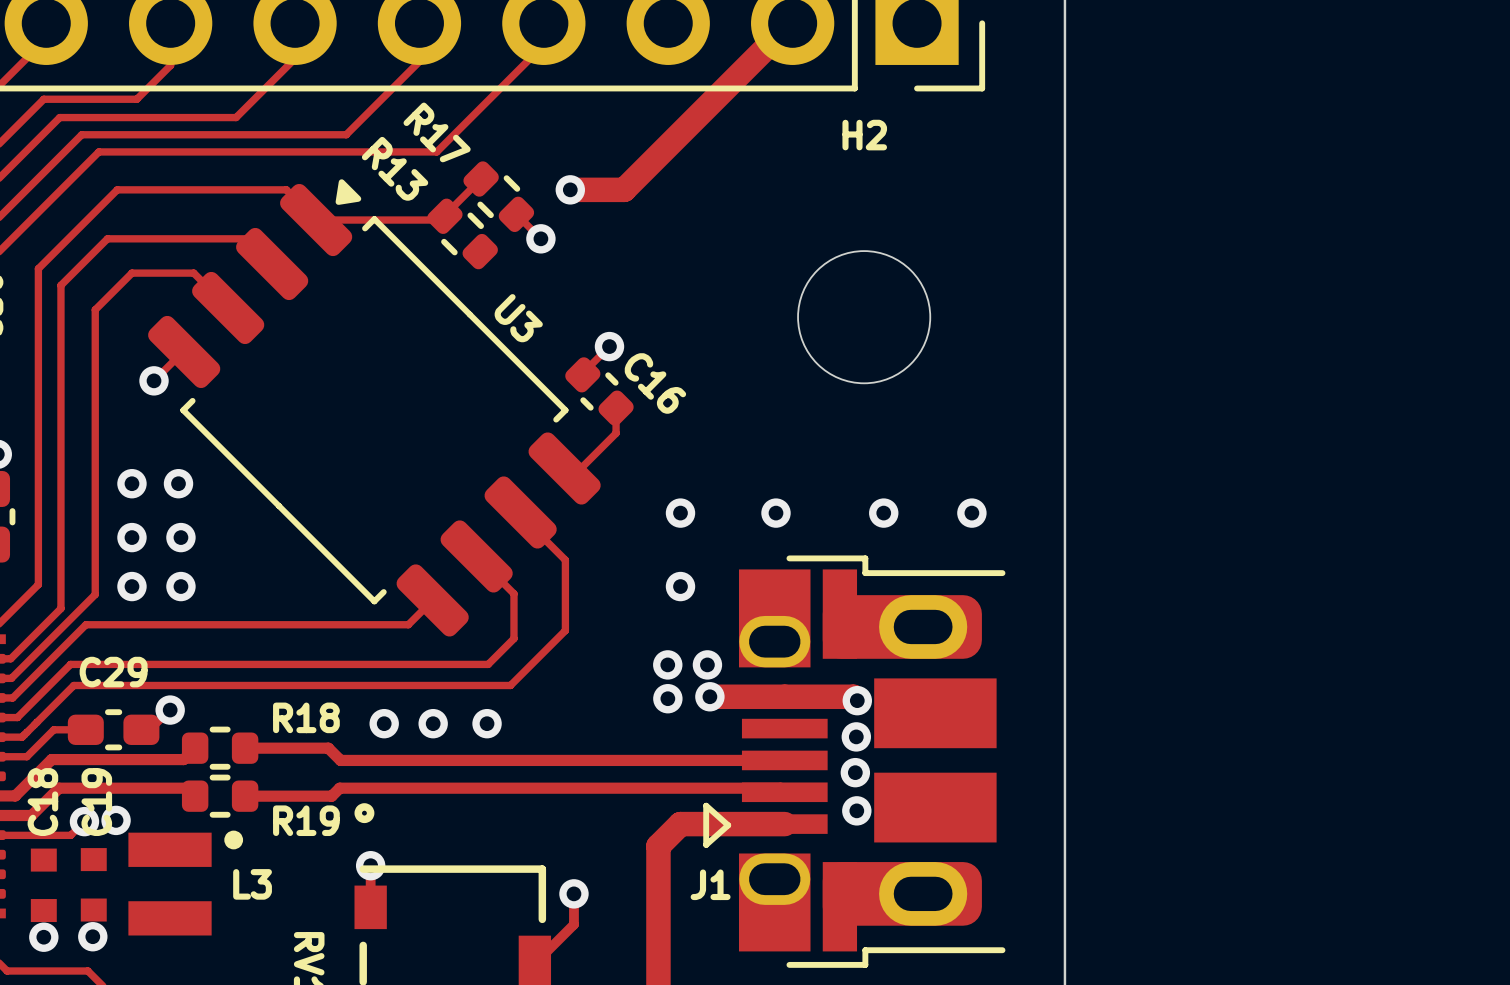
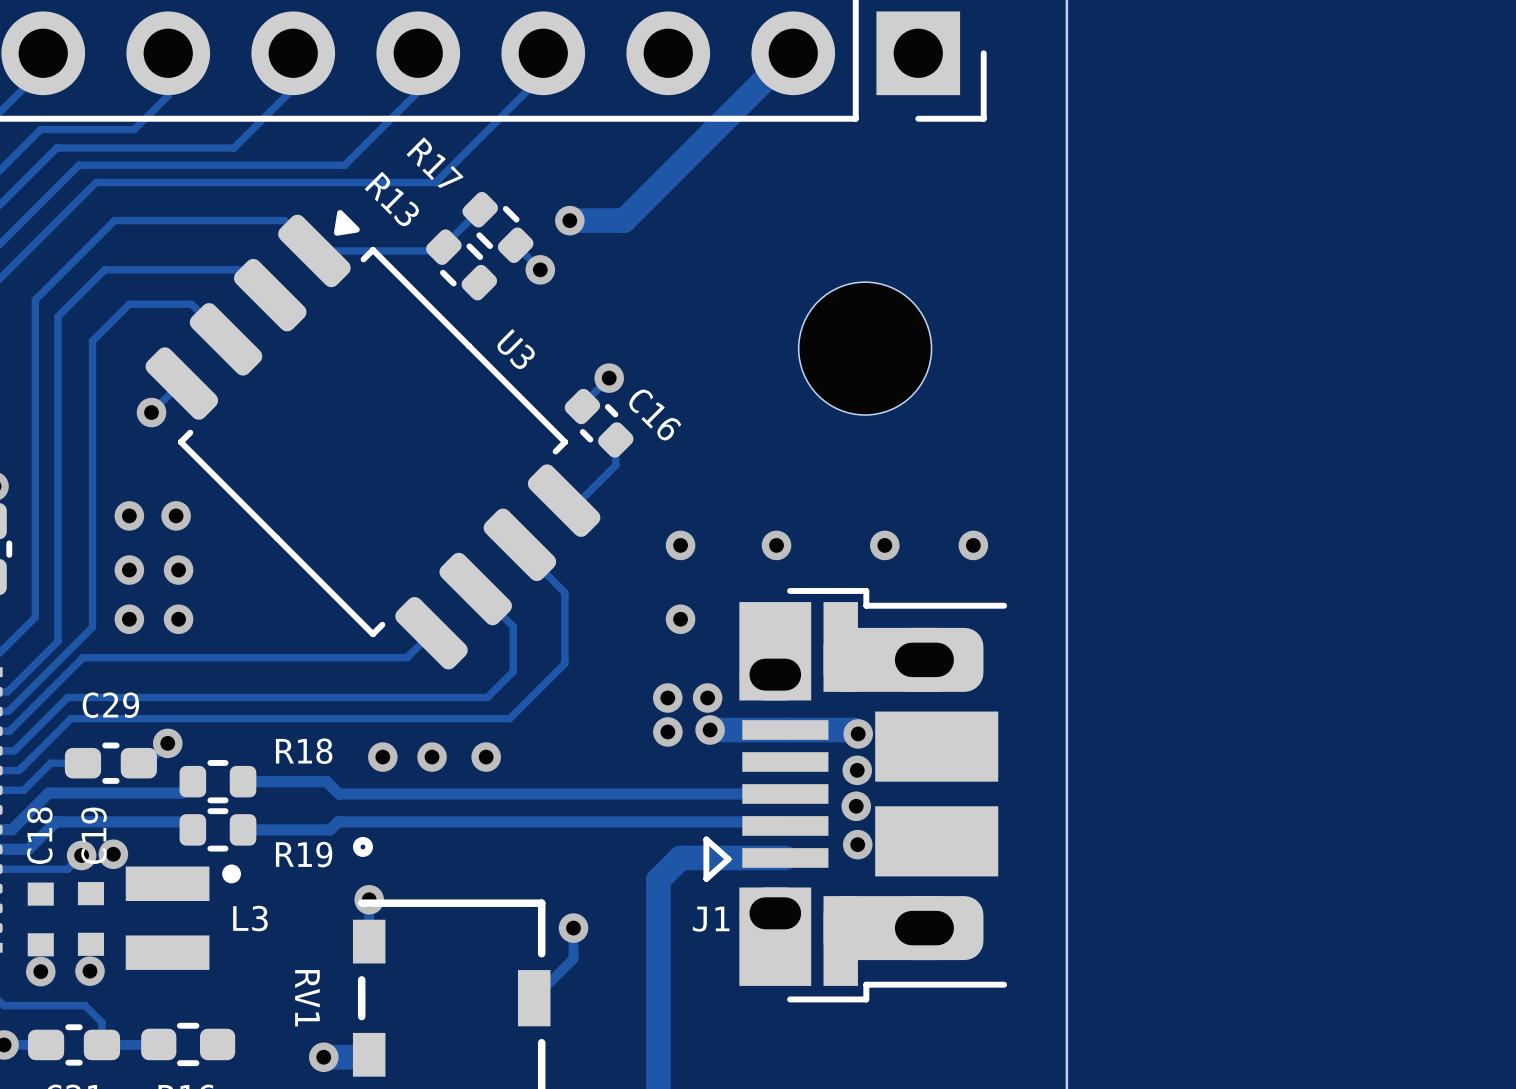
H2 name: H2 (864, 135) -> none

